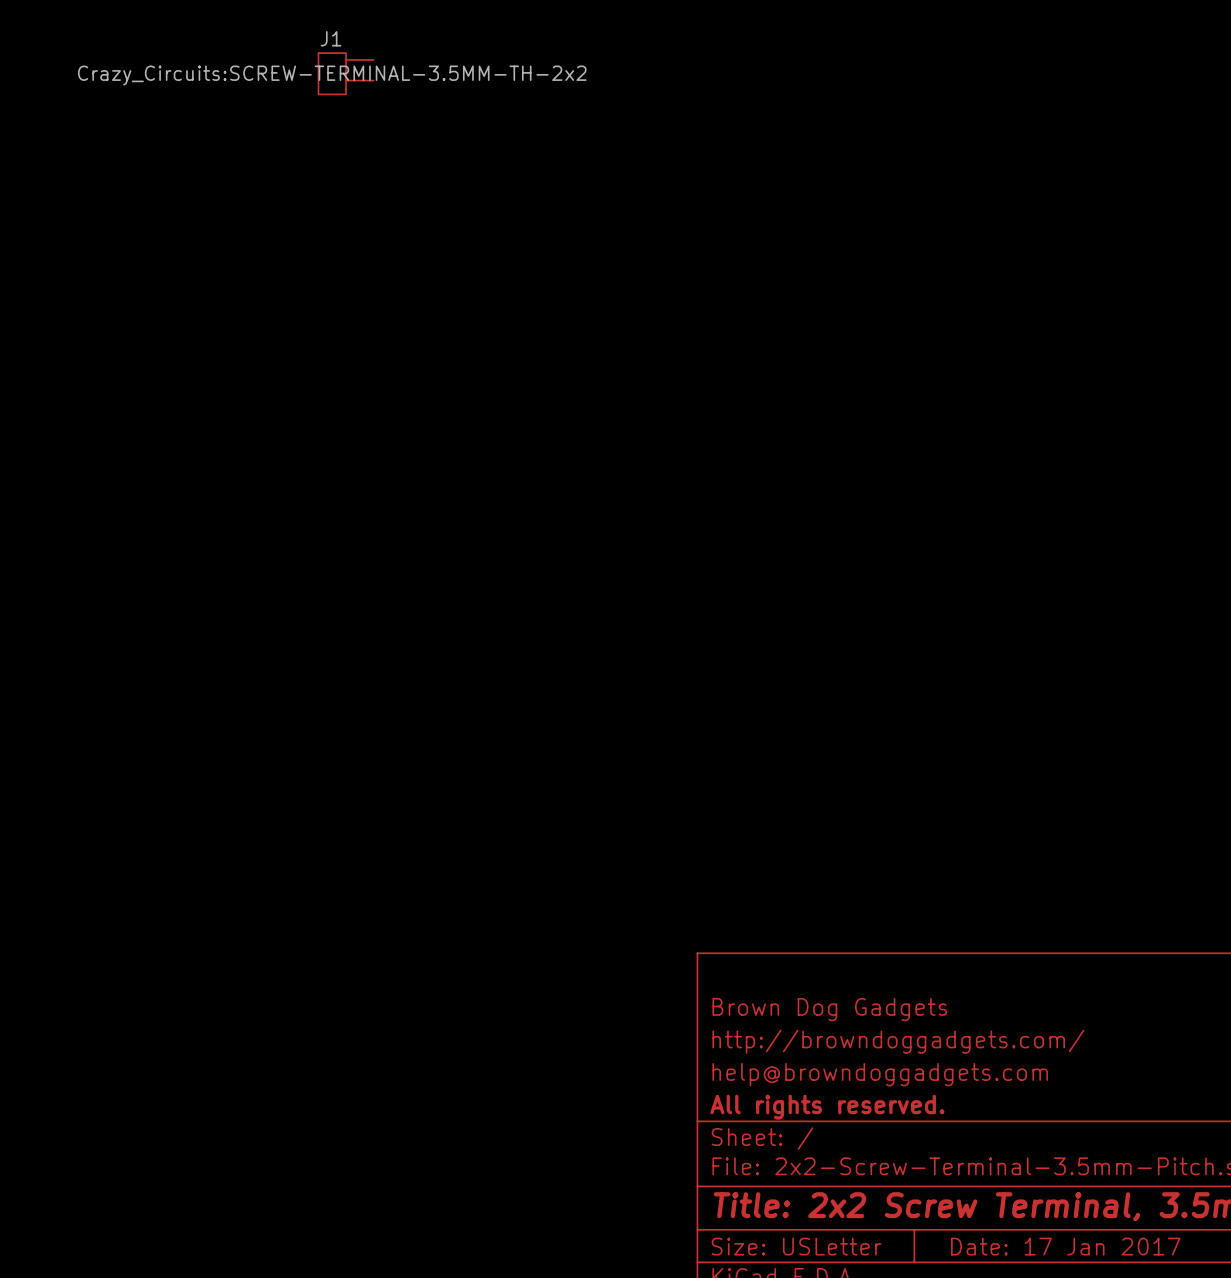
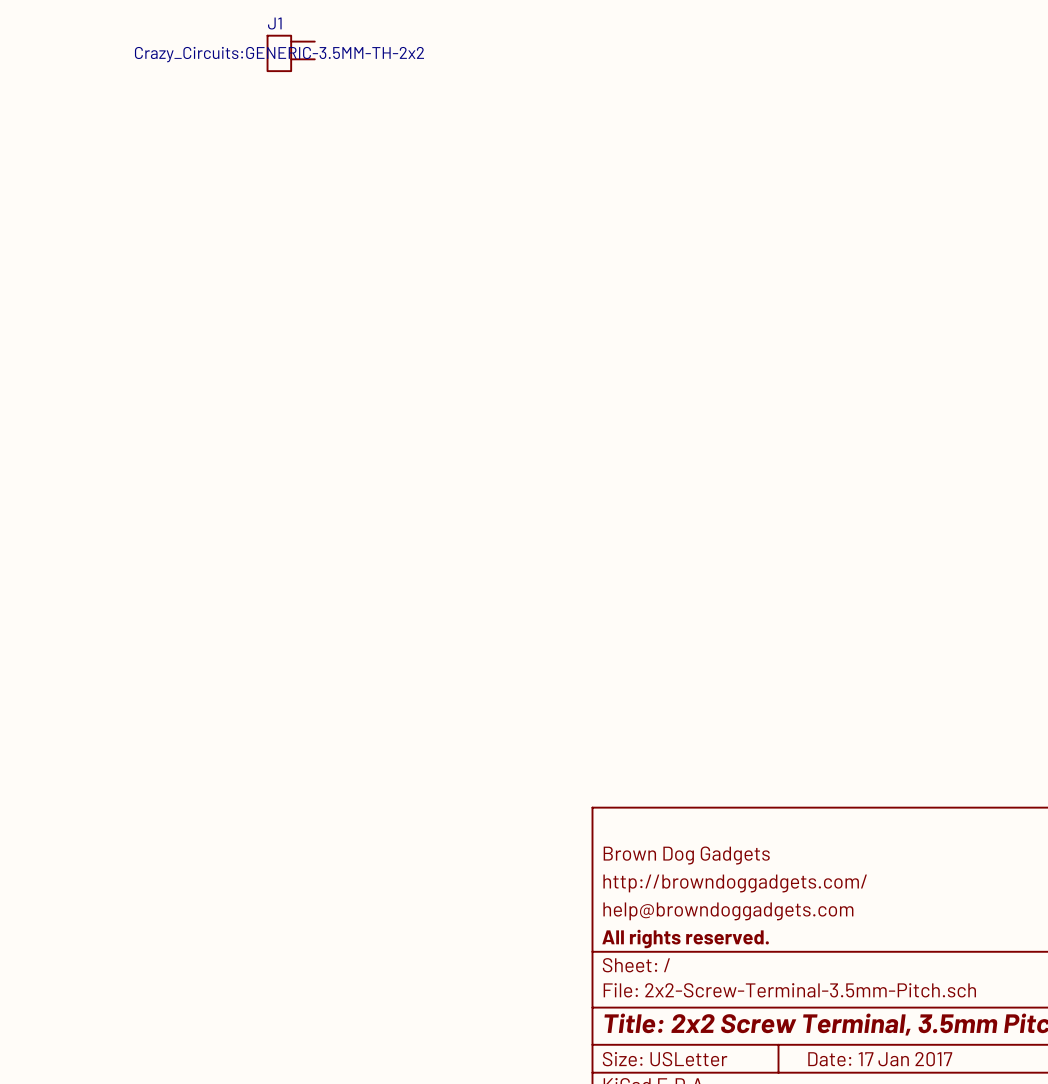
J1 text: Crazy_Circuits:SCREW-TERMINAL-3.5MM-TH-2x2 (332, 75) -> Crazy_Circuits:GENERIC-3.5MM-TH-2x2 (279, 54)

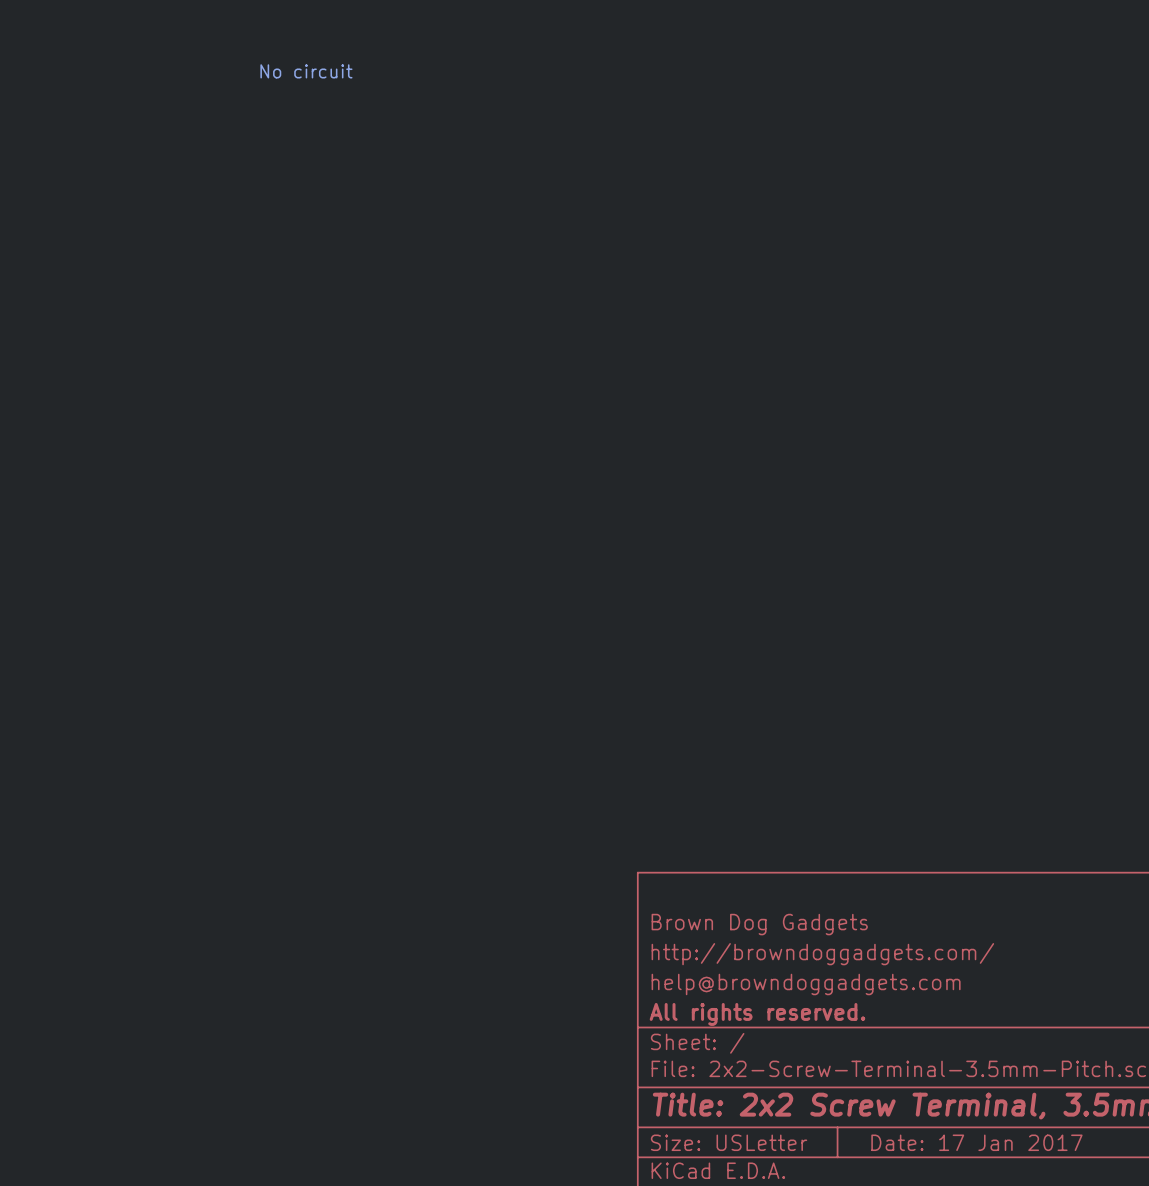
J1: (291, 53) -> none
text: none -> No circuit (306, 71)

